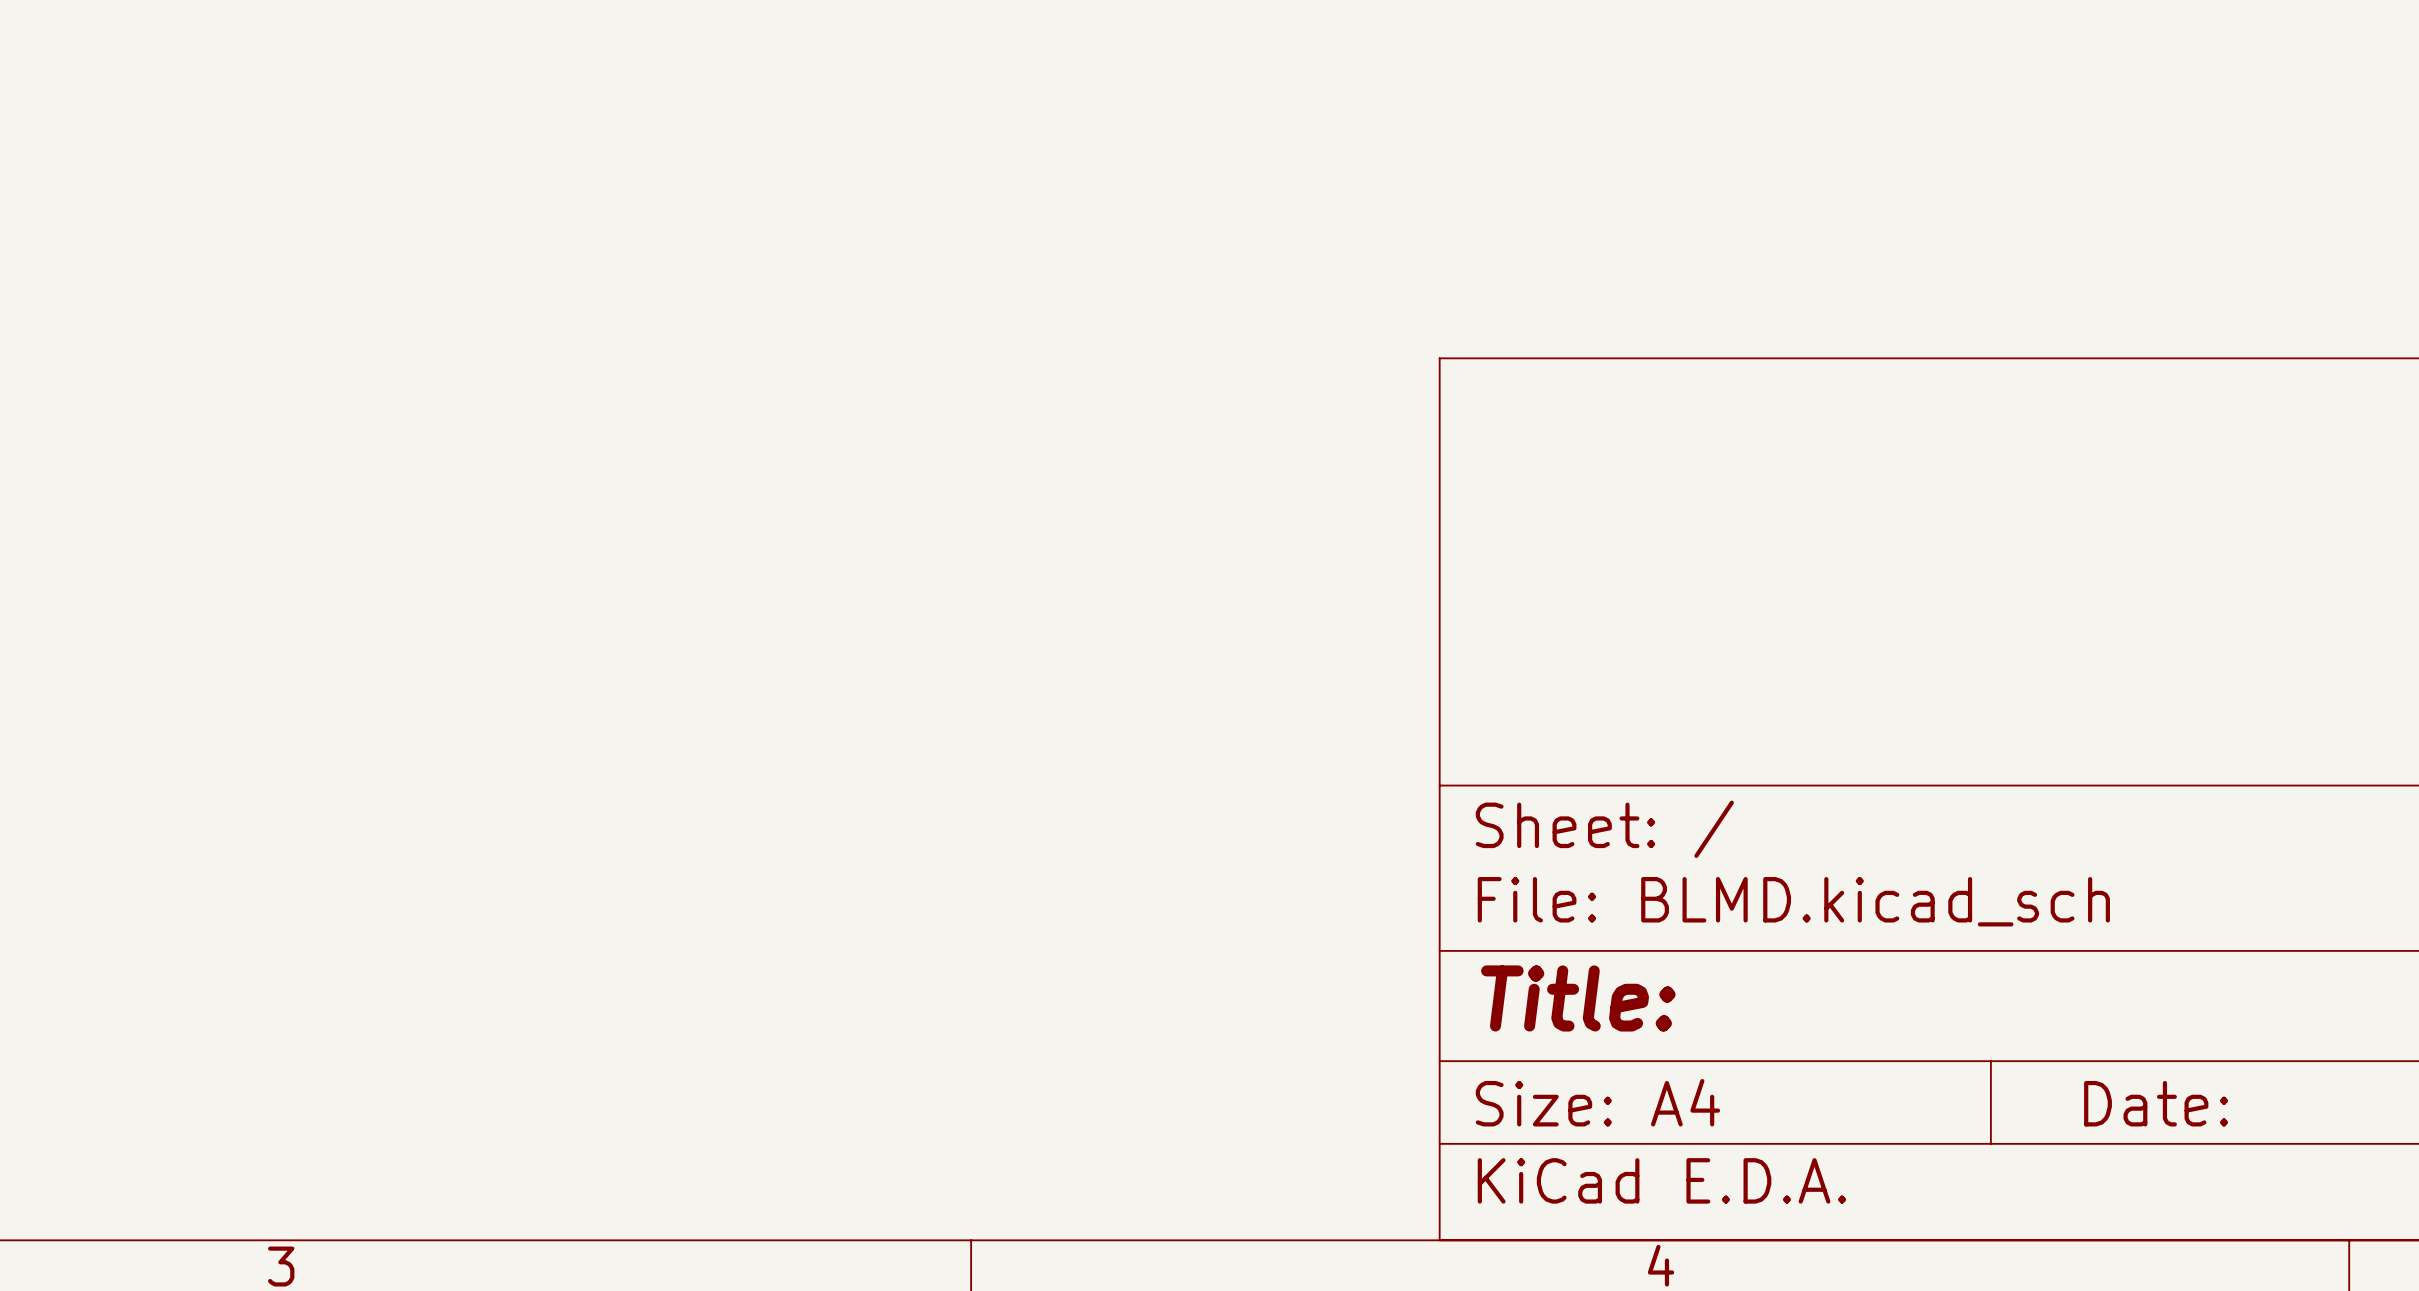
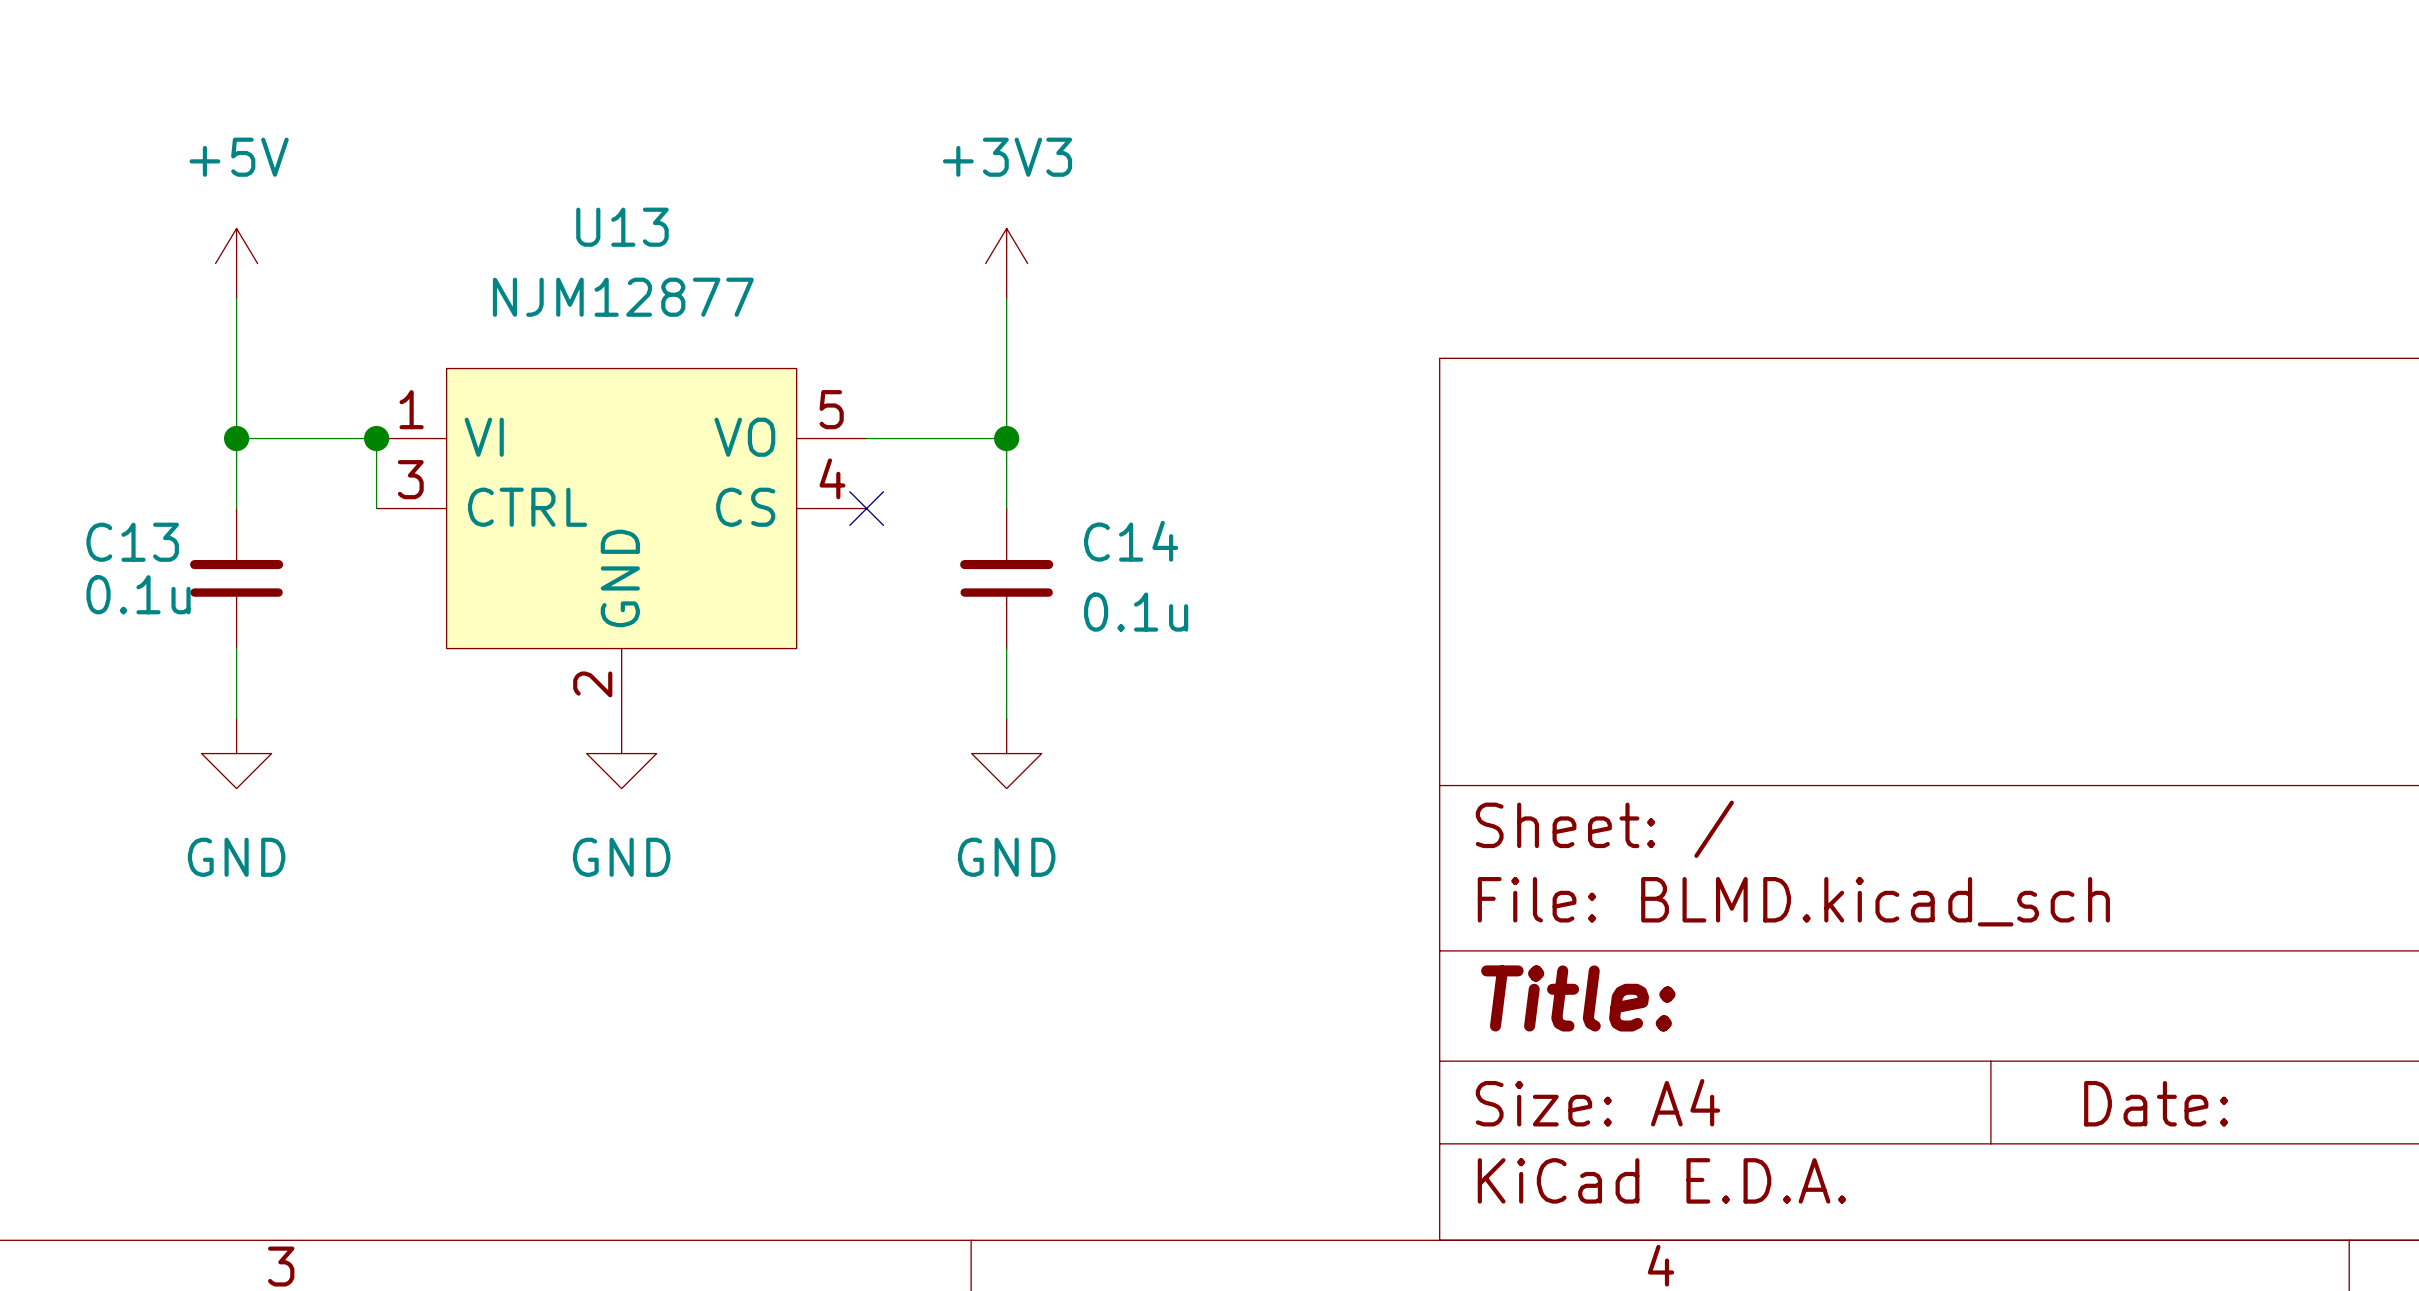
power symbol: none -> +5V (236, 263)
power symbol: none -> +3V3 (1006, 263)
wire: none -> (236, 298) (236, 508)
wire: none -> (1006, 298) (1006, 508)
wire: none -> (236, 438) (376, 438) (376, 508)
junction: none -> (236, 438)
junction: none -> (376, 438)
wire: none -> (866, 438) (1006, 438)
junction: none -> (1006, 438)
no-connect mark: none -> (866, 508)
U13: none -> NJM12877 (621, 543)
C13: none -> 0.1u (236, 578)
C14: none -> 0.1u (1006, 578)
wire: none -> (236, 648) (236, 718)
wire: none -> (1006, 648) (1006, 718)
power symbol: none -> GND (236, 753)
power symbol: none -> GND (621, 753)
power symbol: none -> GND (1006, 753)

